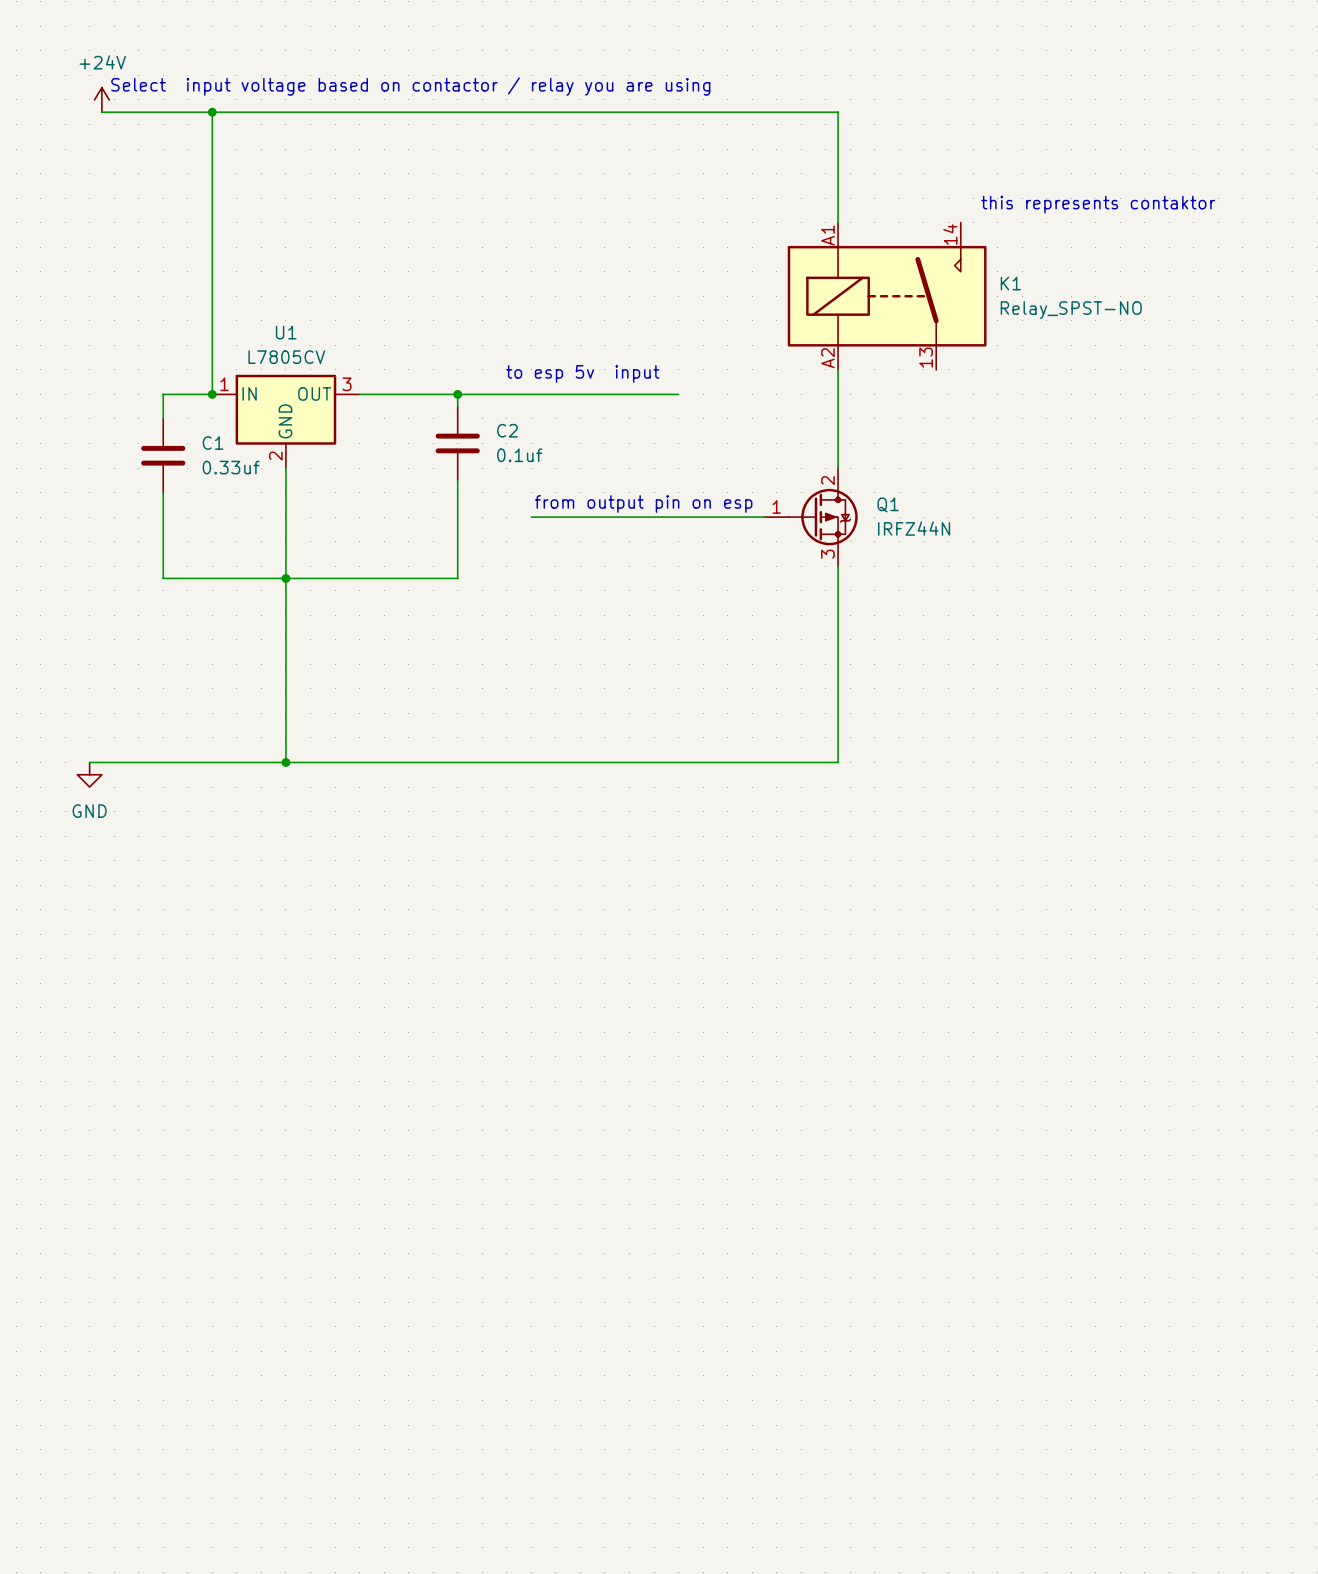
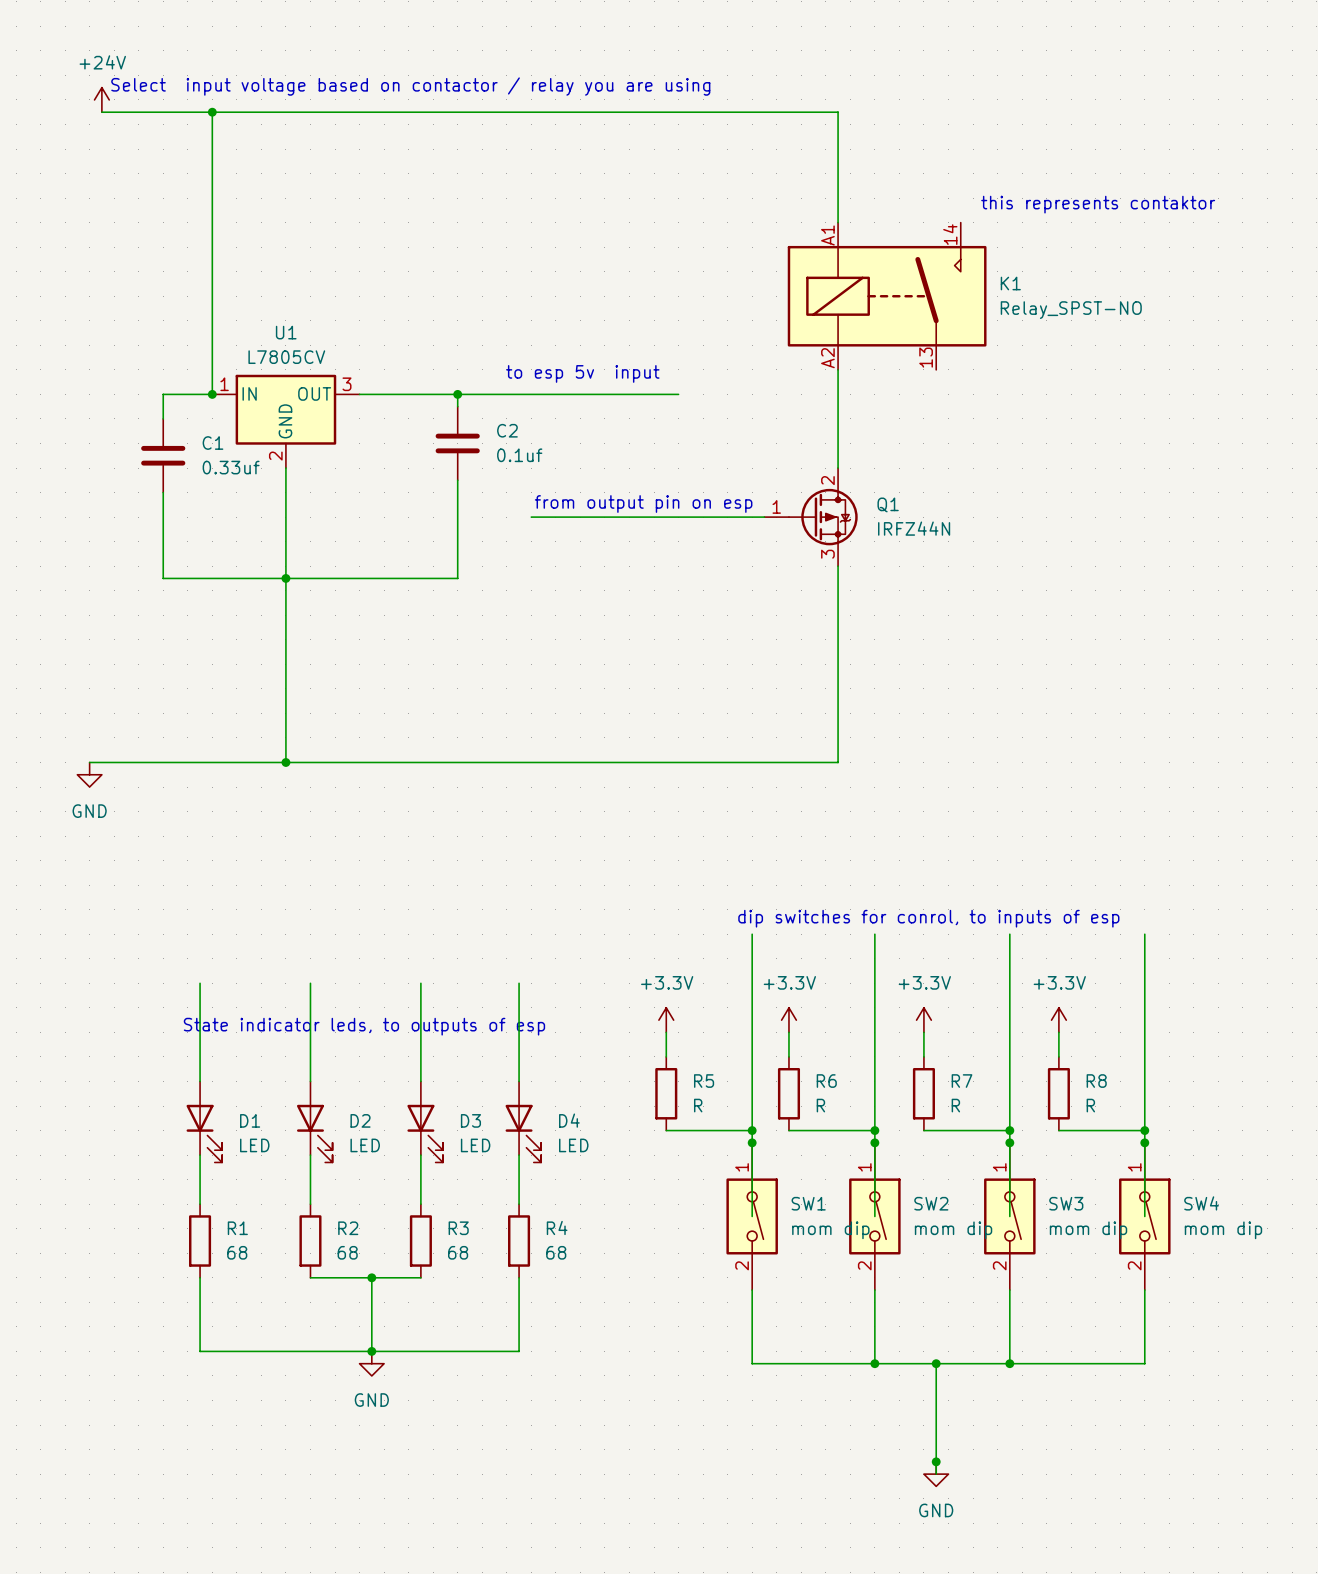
text: none -> dip switches for conrol, to inputs of esp (928, 918)
wire: none -> (752, 934) (752, 1216)
wire: none -> (874, 934) (874, 1216)
wire: none -> (1009, 934) (1009, 1216)
wire: none -> (1144, 934) (1144, 1216)
wire: none -> (200, 983) (200, 1081)
wire: none -> (310, 983) (310, 1081)
wire: none -> (420, 983) (420, 1081)
wire: none -> (519, 983) (519, 1081)
power symbol: none -> +3.3V (666, 1020)
power symbol: none -> +3.3V (788, 1020)
power symbol: none -> +3.3V (923, 1020)
power symbol: none -> +3.3V (1058, 1020)
text: none -> State indicator leds, to outputs of esp (364, 1026)
wire: none -> (666, 1032) (666, 1056)
wire: none -> (788, 1032) (788, 1056)
wire: none -> (923, 1032) (923, 1056)
wire: none -> (1058, 1032) (1058, 1056)
R5: none -> R (666, 1093)
R6: none -> R (788, 1093)
R7: none -> R (923, 1093)
R8: none -> R (1058, 1093)
D1: none -> LED (204, 1121)
D2: none -> LED (314, 1121)
D3: none -> LED (425, 1121)
D4: none -> LED (523, 1121)
wire: none -> (666, 1130) (752, 1130)
junction: none -> (752, 1130)
wire: none -> (788, 1130) (874, 1130)
junction: none -> (874, 1130)
wire: none -> (923, 1130) (1009, 1130)
junction: none -> (1009, 1130)
wire: none -> (1058, 1130) (1144, 1130)
junction: none -> (1144, 1130)
junction: none -> (752, 1142)
junction: none -> (874, 1142)
junction: none -> (1009, 1142)
junction: none -> (1144, 1142)
wire: none -> (200, 1155) (200, 1204)
wire: none -> (310, 1155) (310, 1204)
wire: none -> (420, 1155) (420, 1204)
wire: none -> (519, 1155) (519, 1204)
SW1: none -> mom dip (752, 1216)
SW2: none -> mom dip (874, 1216)
SW3: none -> mom dip (1009, 1216)
SW4: none -> mom dip (1144, 1216)
R1: none -> 68 (200, 1240)
R2: none -> 68 (310, 1240)
R3: none -> 68 (420, 1240)
R4: none -> 68 (519, 1240)
wire: none -> (200, 1277) (200, 1351) (519, 1351) (519, 1277)
wire: none -> (310, 1277) (420, 1277)
wire: none -> (371, 1277) (371, 1351)
junction: none -> (371, 1277)
wire: none -> (752, 1290) (752, 1363) (1144, 1363) (1144, 1290)
wire: none -> (874, 1290) (874, 1363)
wire: none -> (1009, 1290) (1009, 1363)
junction: none -> (371, 1351)
power symbol: none -> GND (371, 1363)
junction: none -> (874, 1363)
wire: none -> (936, 1363) (936, 1474)
junction: none -> (936, 1363)
junction: none -> (1009, 1363)
junction: none -> (936, 1461)
power symbol: none -> GND (936, 1474)

